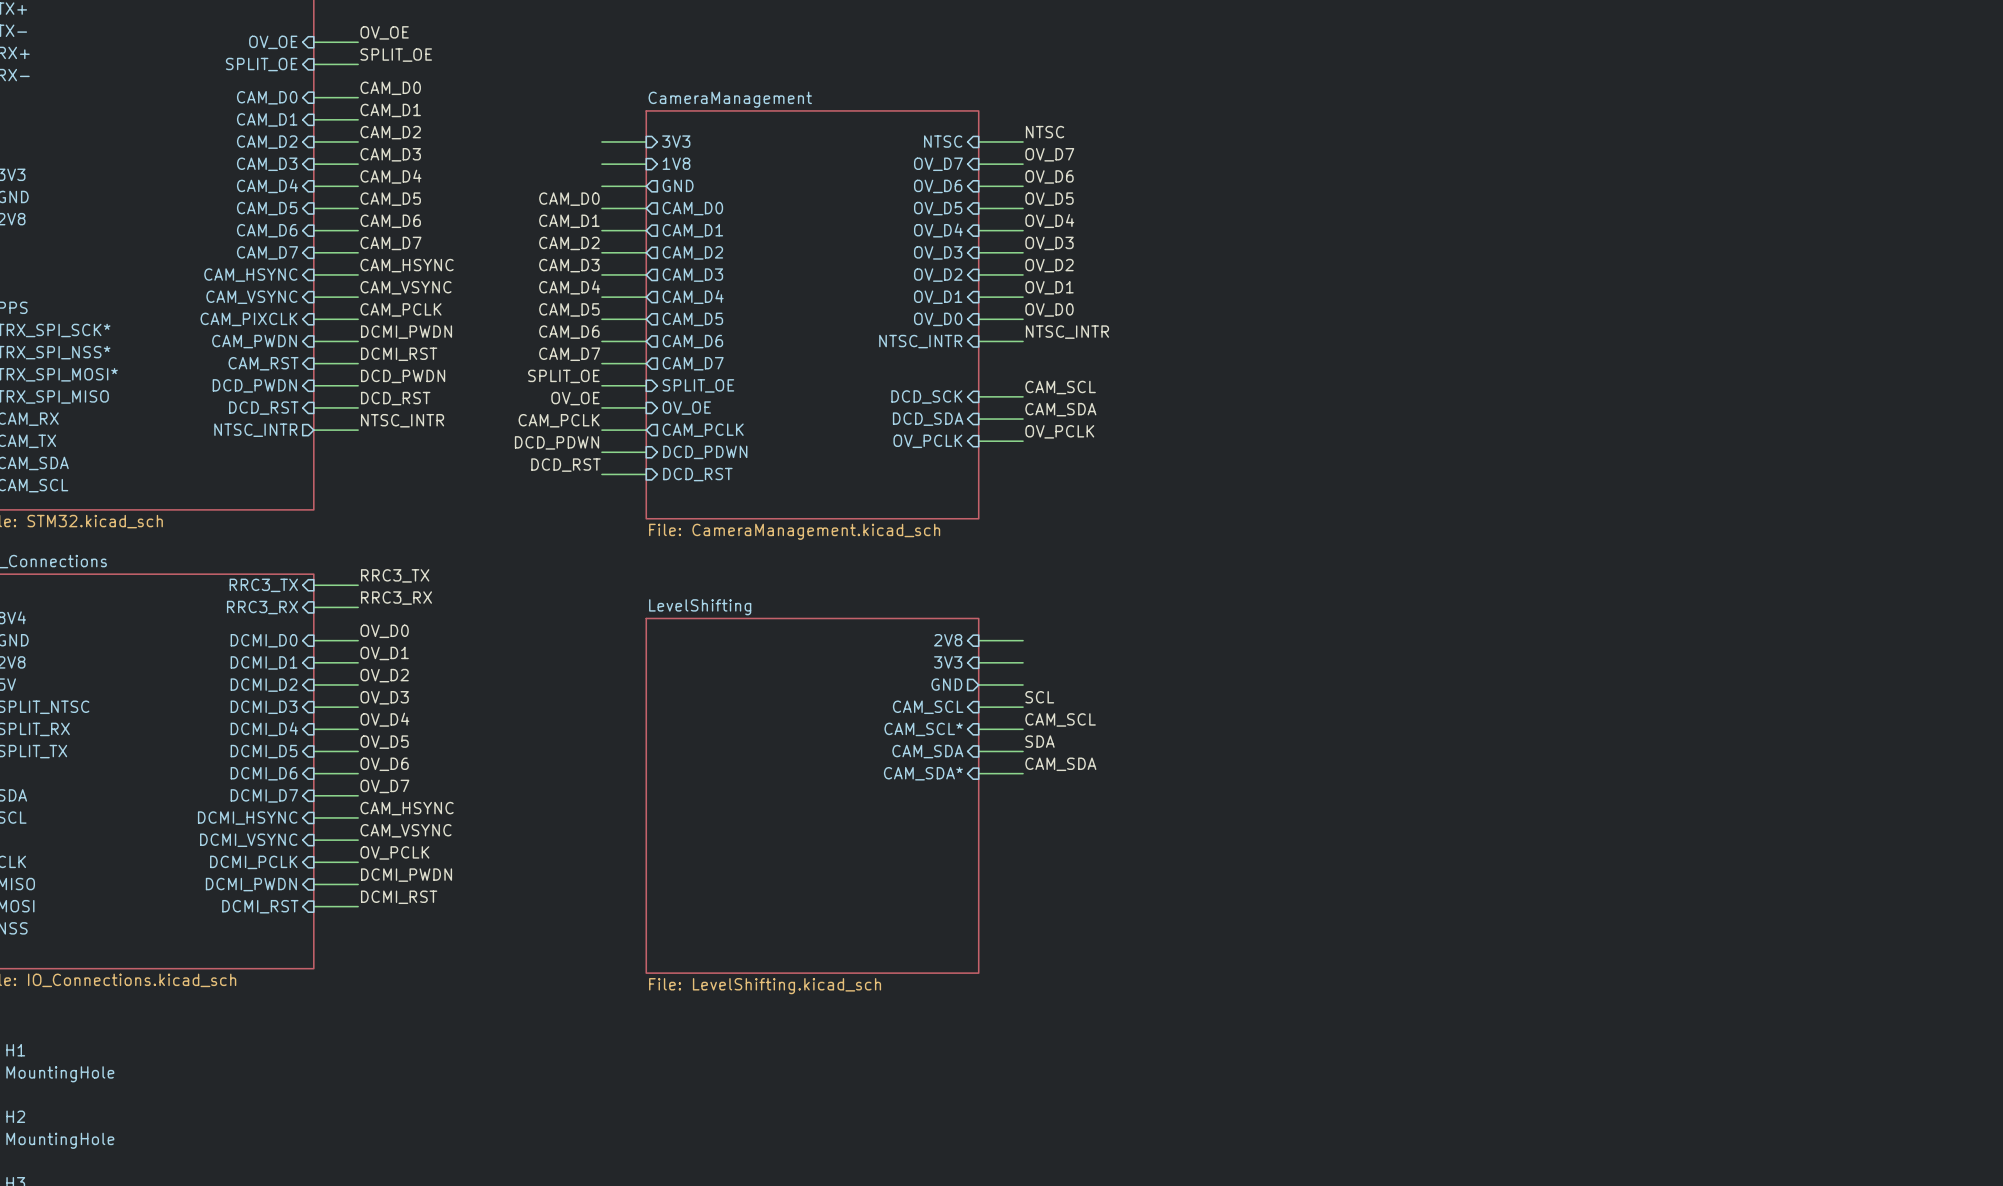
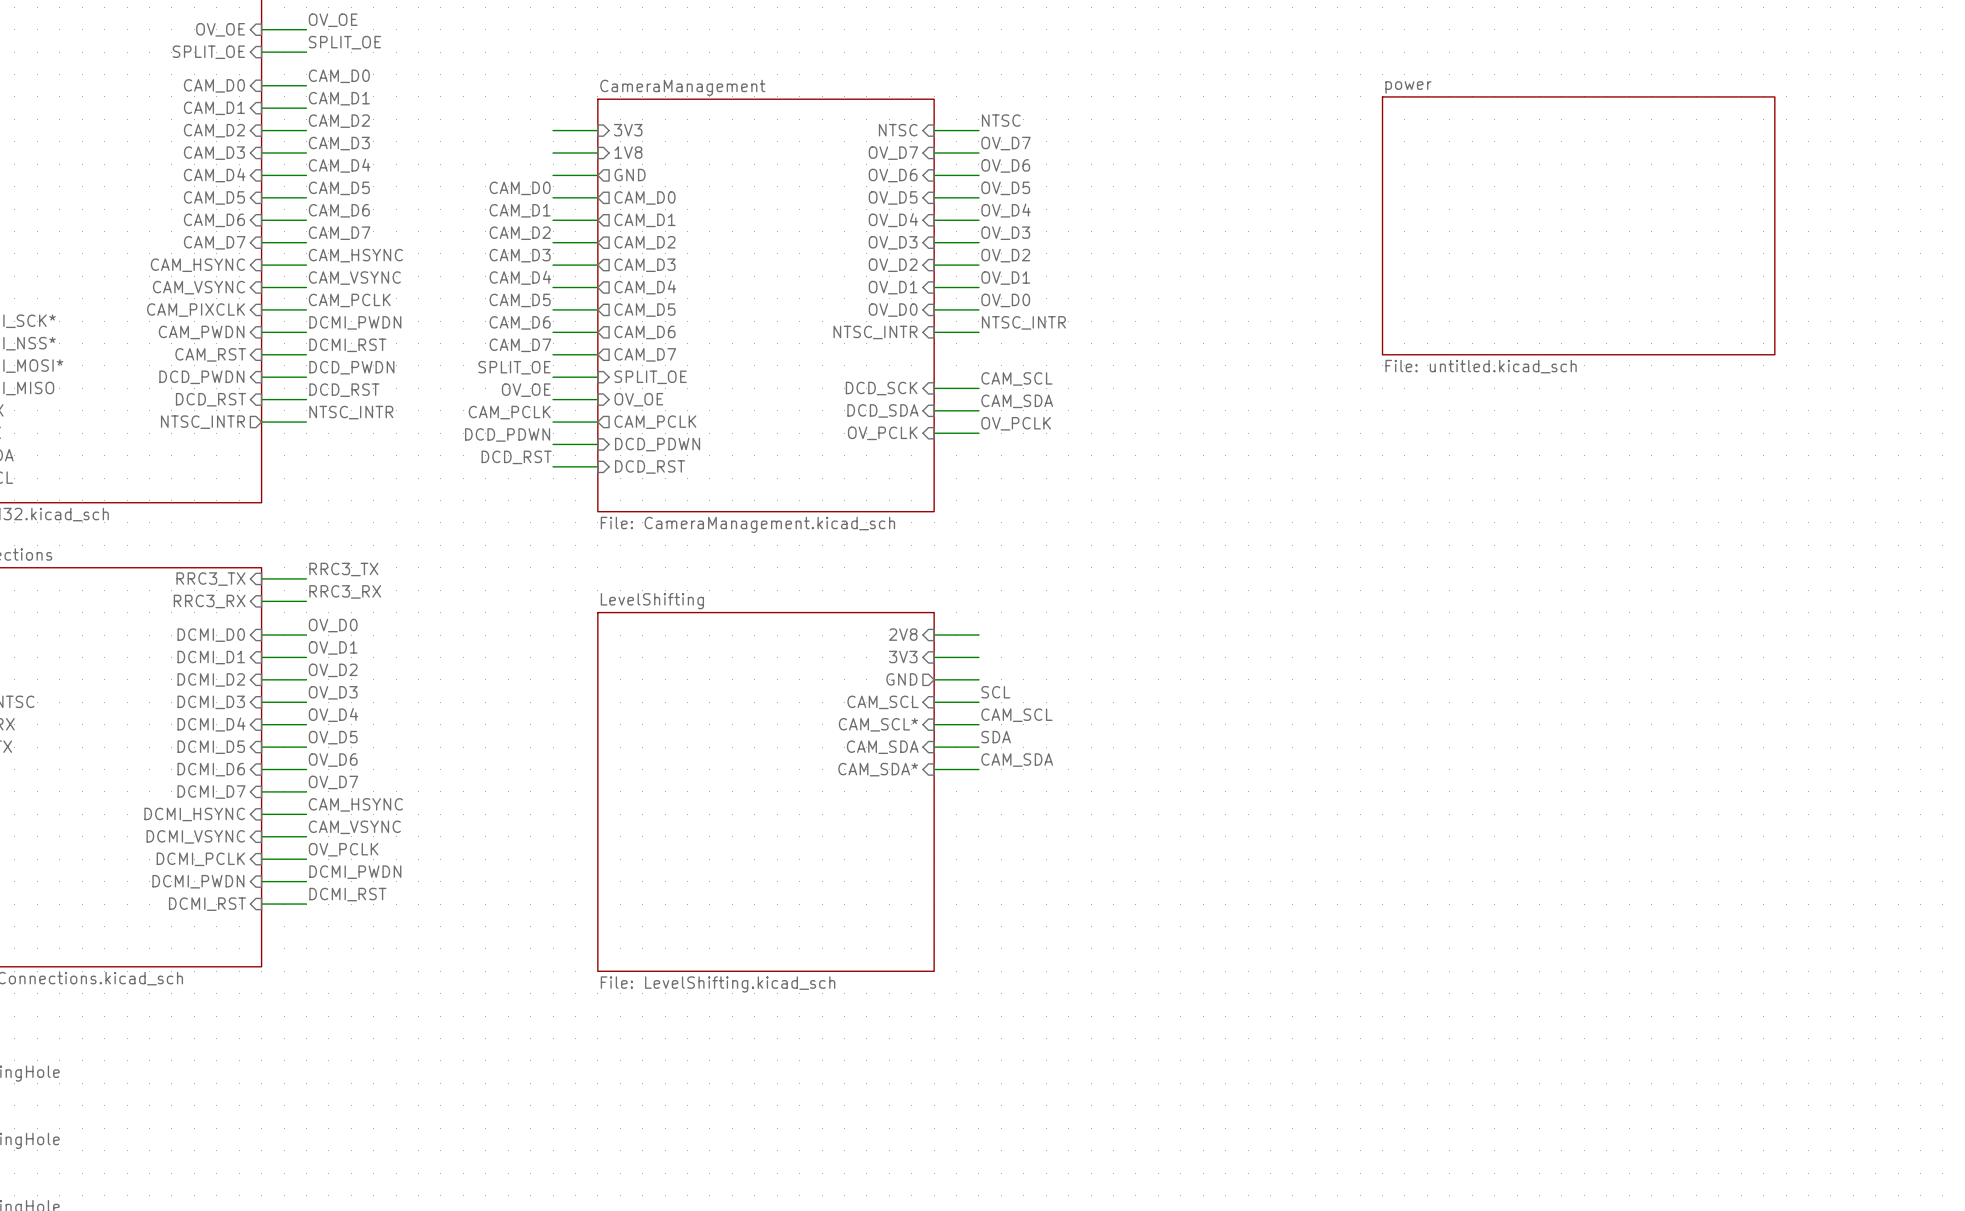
sheet power: none -> File: untitled.kicad_sch (1578, 225)

